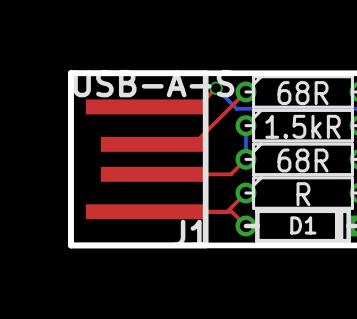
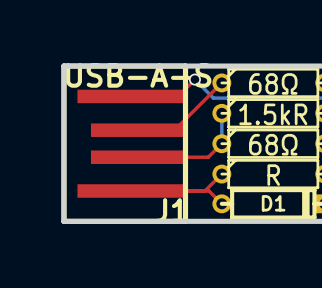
part value: 68R (303, 93) -> 68Ω (273, 83)
part value: 68R (303, 160) -> 68Ω (273, 144)

